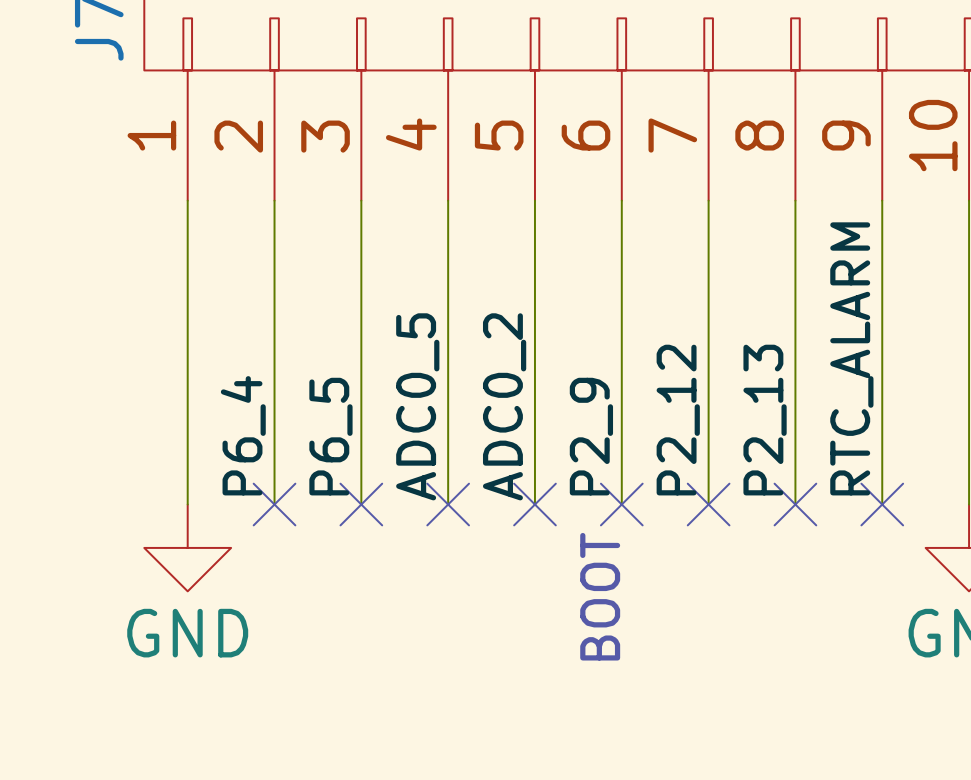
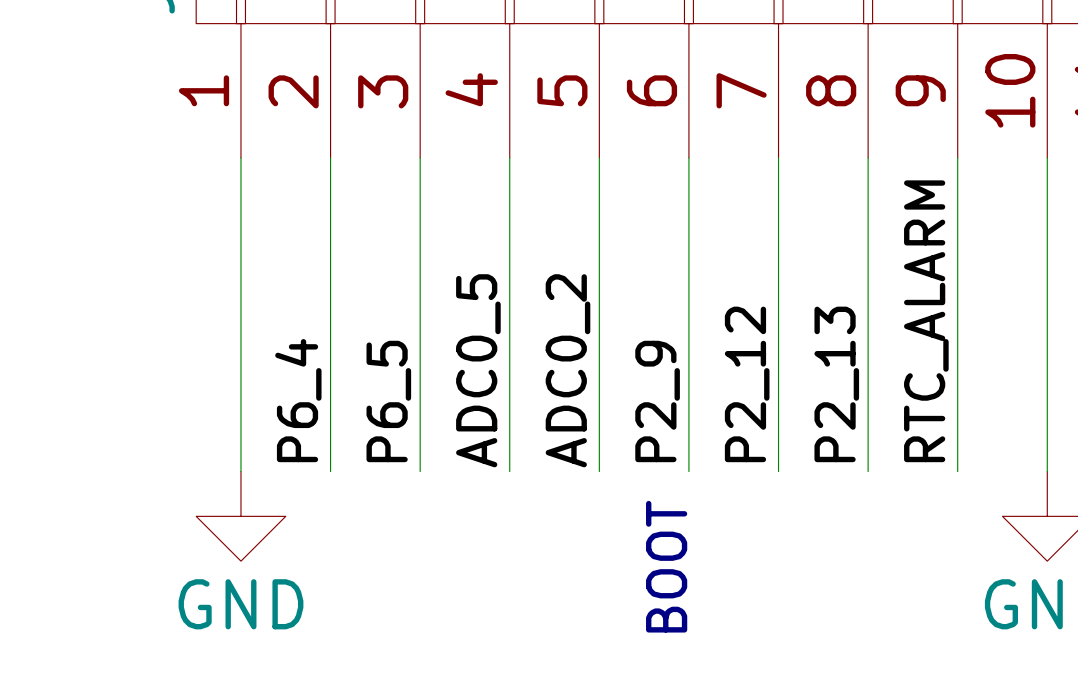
no-connect mark: (274, 504) -> none
no-connect mark: (361, 504) -> none
no-connect mark: (448, 504) -> none
no-connect mark: (534, 504) -> none
no-connect mark: (621, 504) -> none
no-connect mark: (708, 504) -> none
no-connect mark: (795, 504) -> none
no-connect mark: (882, 504) -> none

